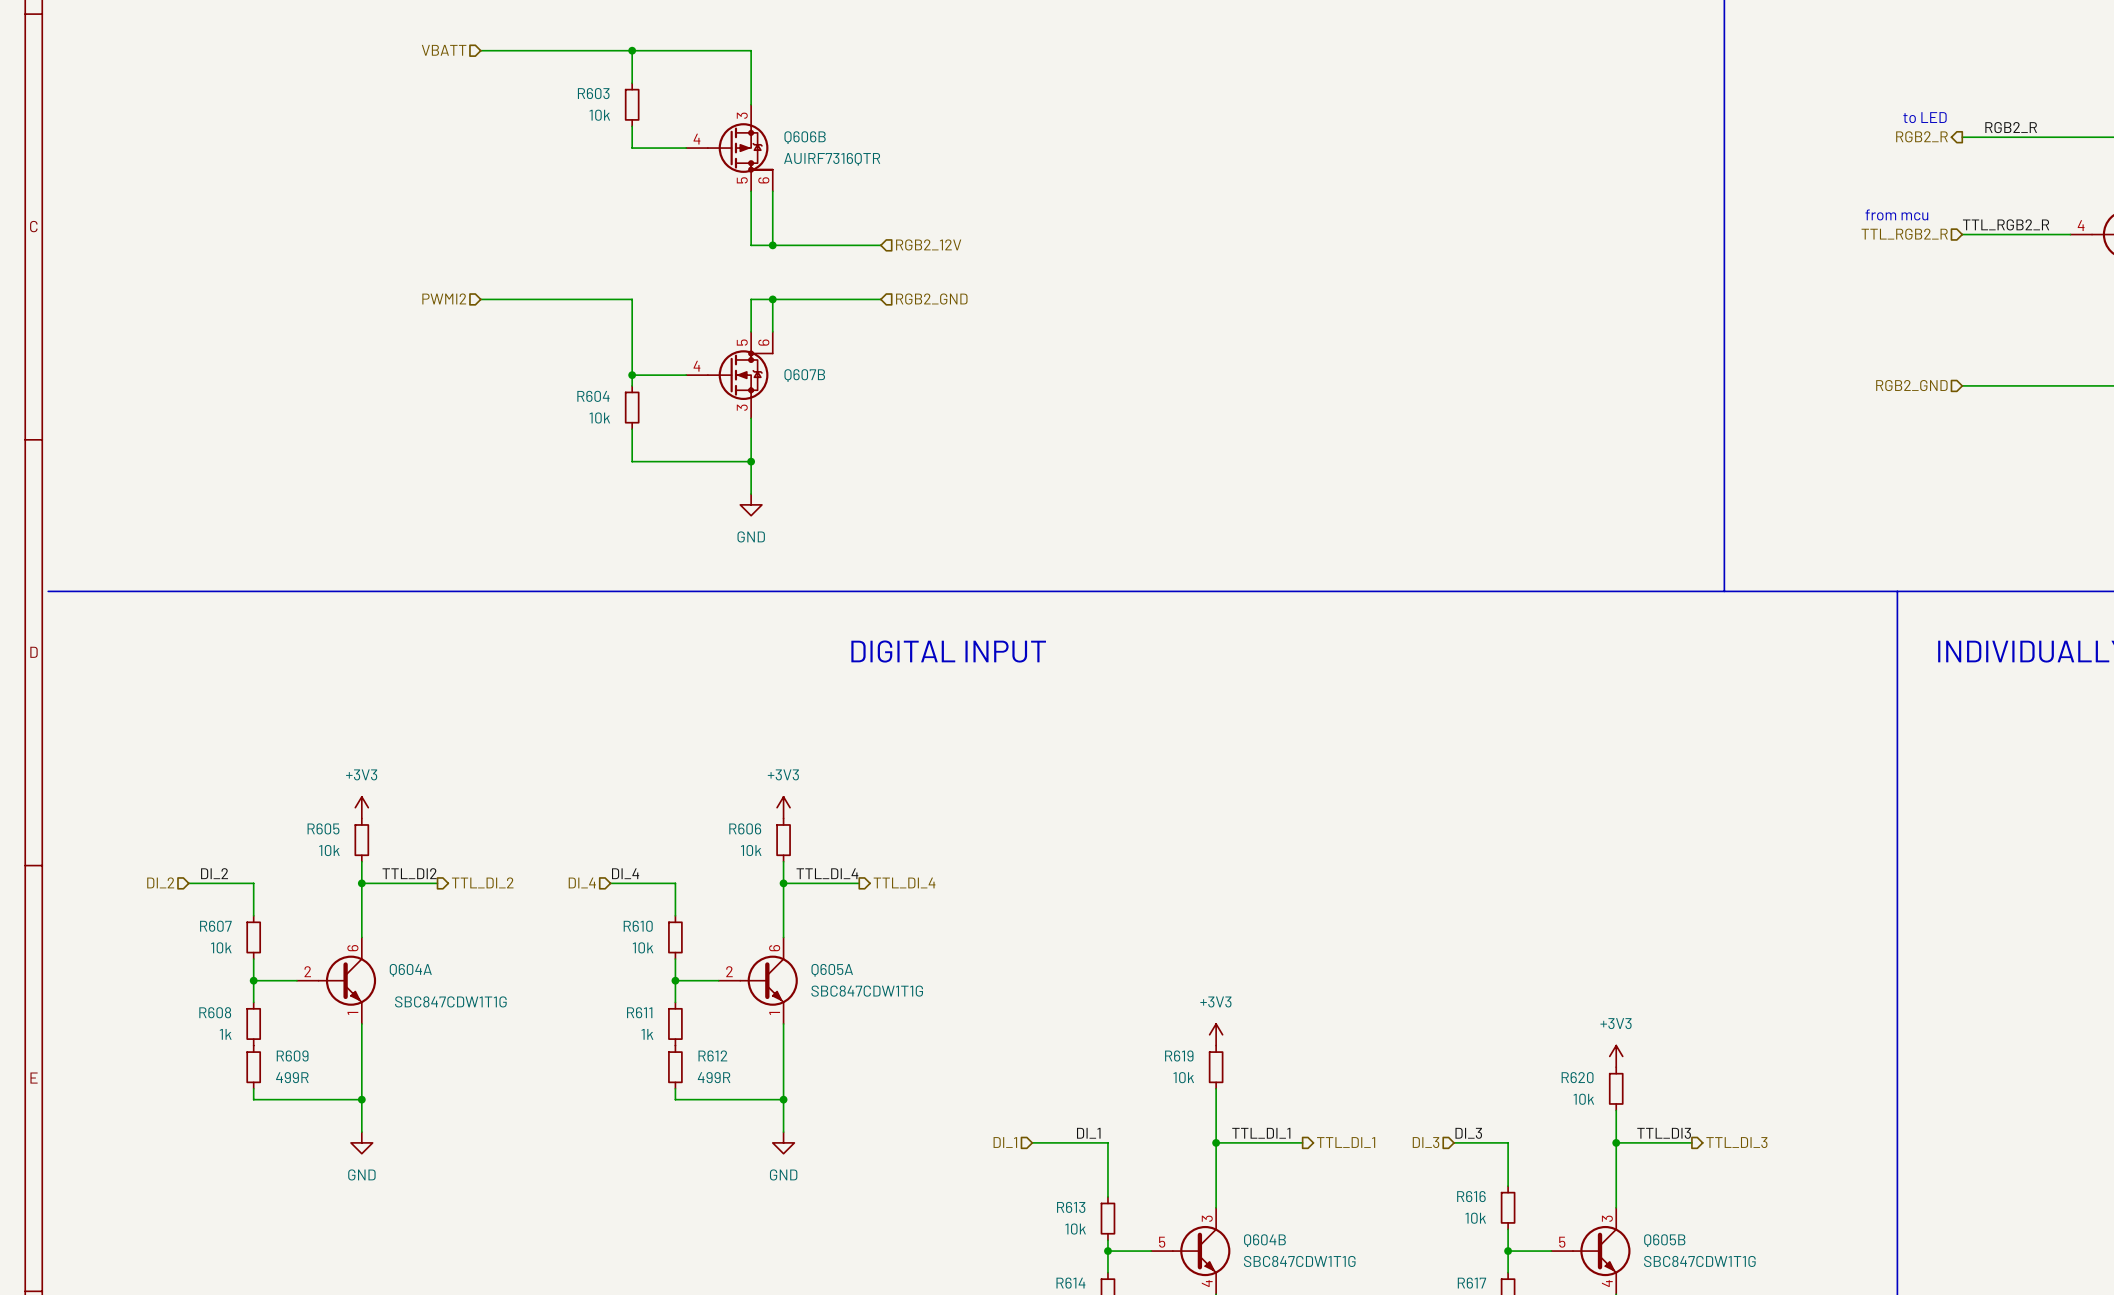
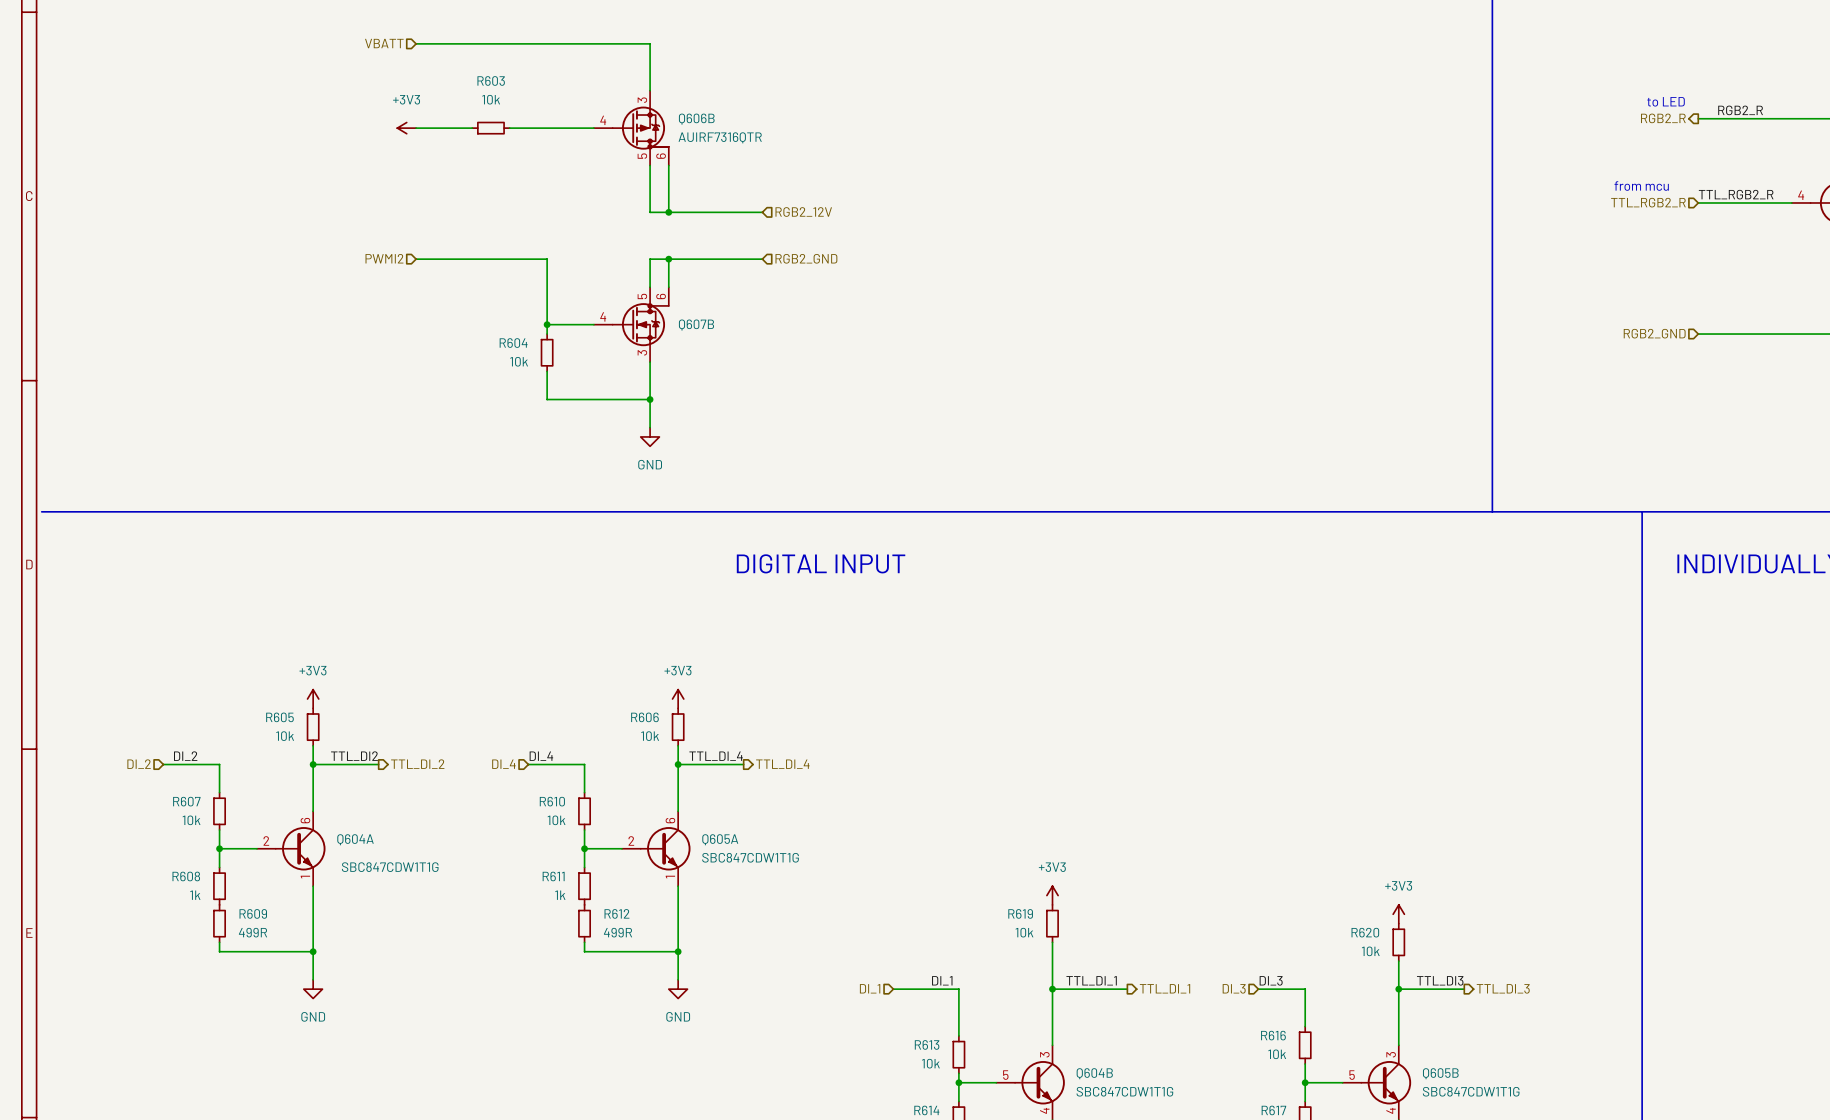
wire: (632, 50) (632, 83) -> none
junction: (632, 50) -> none
R603 rotation: 0° (632, 104) -> 90° clockwise (490, 128)
R603 position: (632, 104) -> (490, 128)
wire: (632, 126) (632, 148) -> (509, 128) (547, 128)
power symbol: none -> +3V3 (406, 128)
wire: none -> (416, 128) (472, 128)

